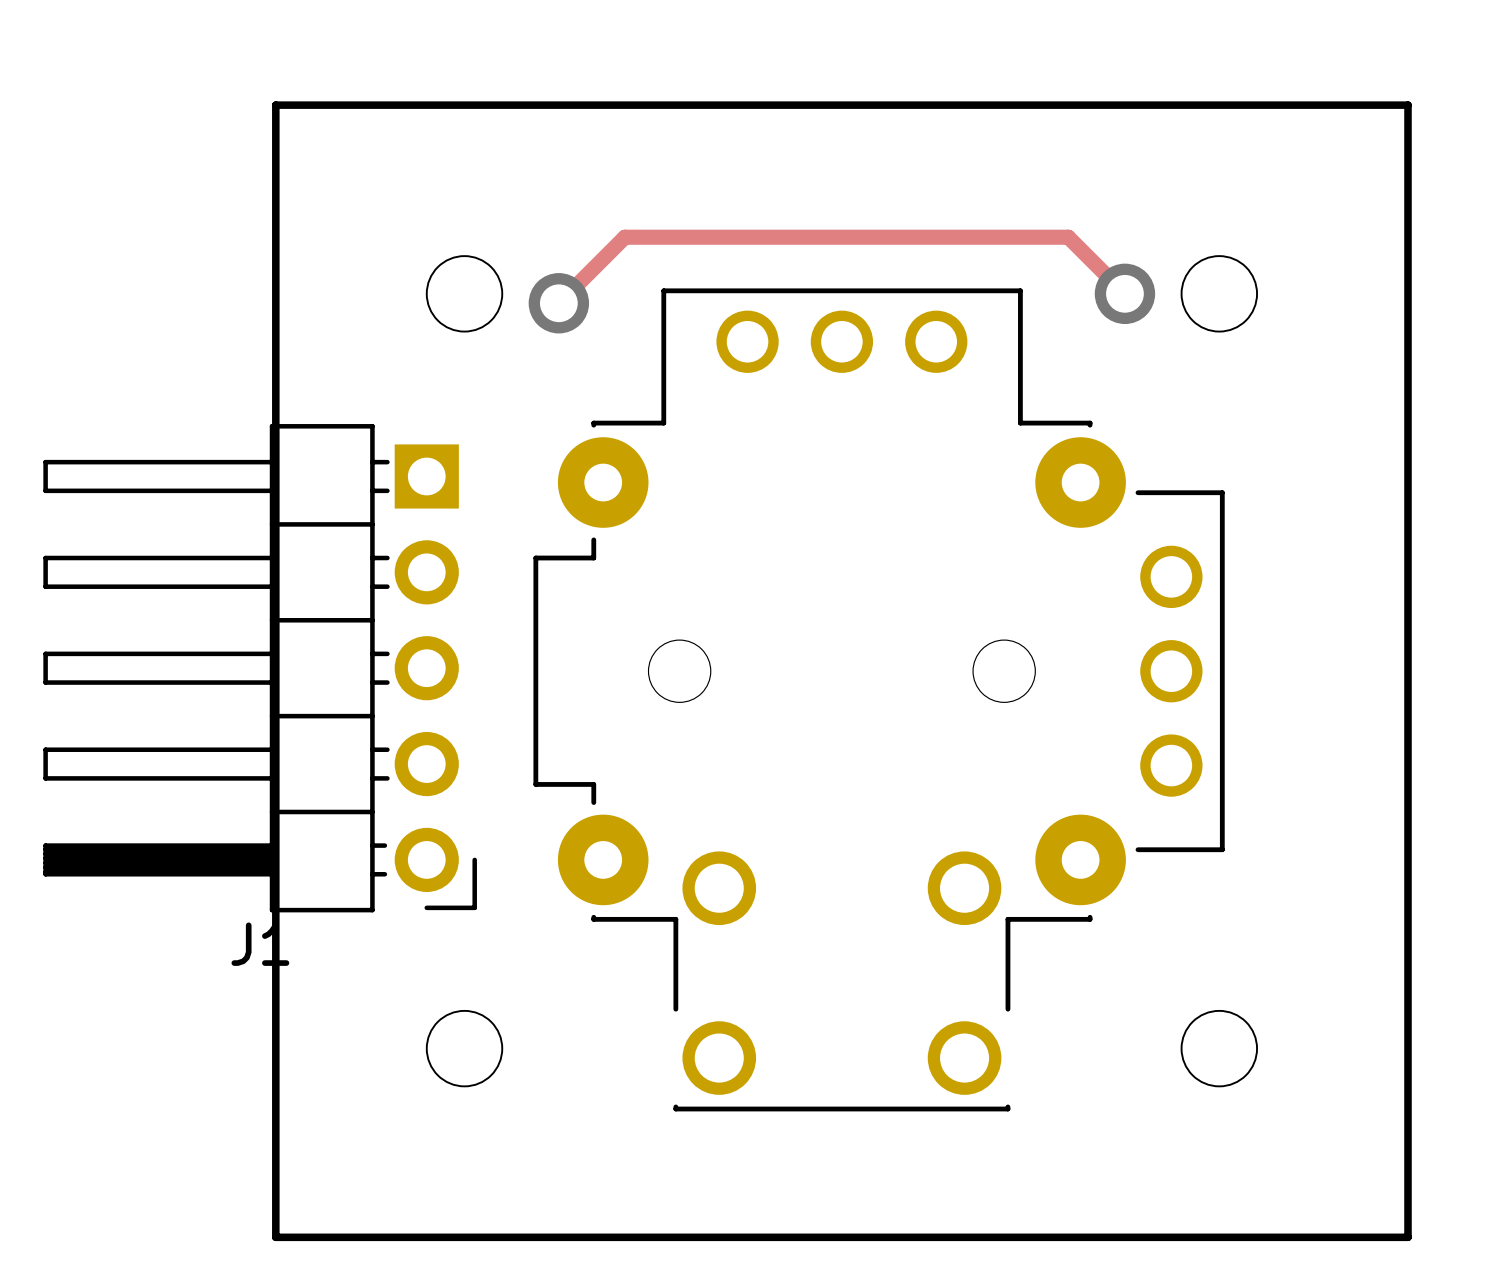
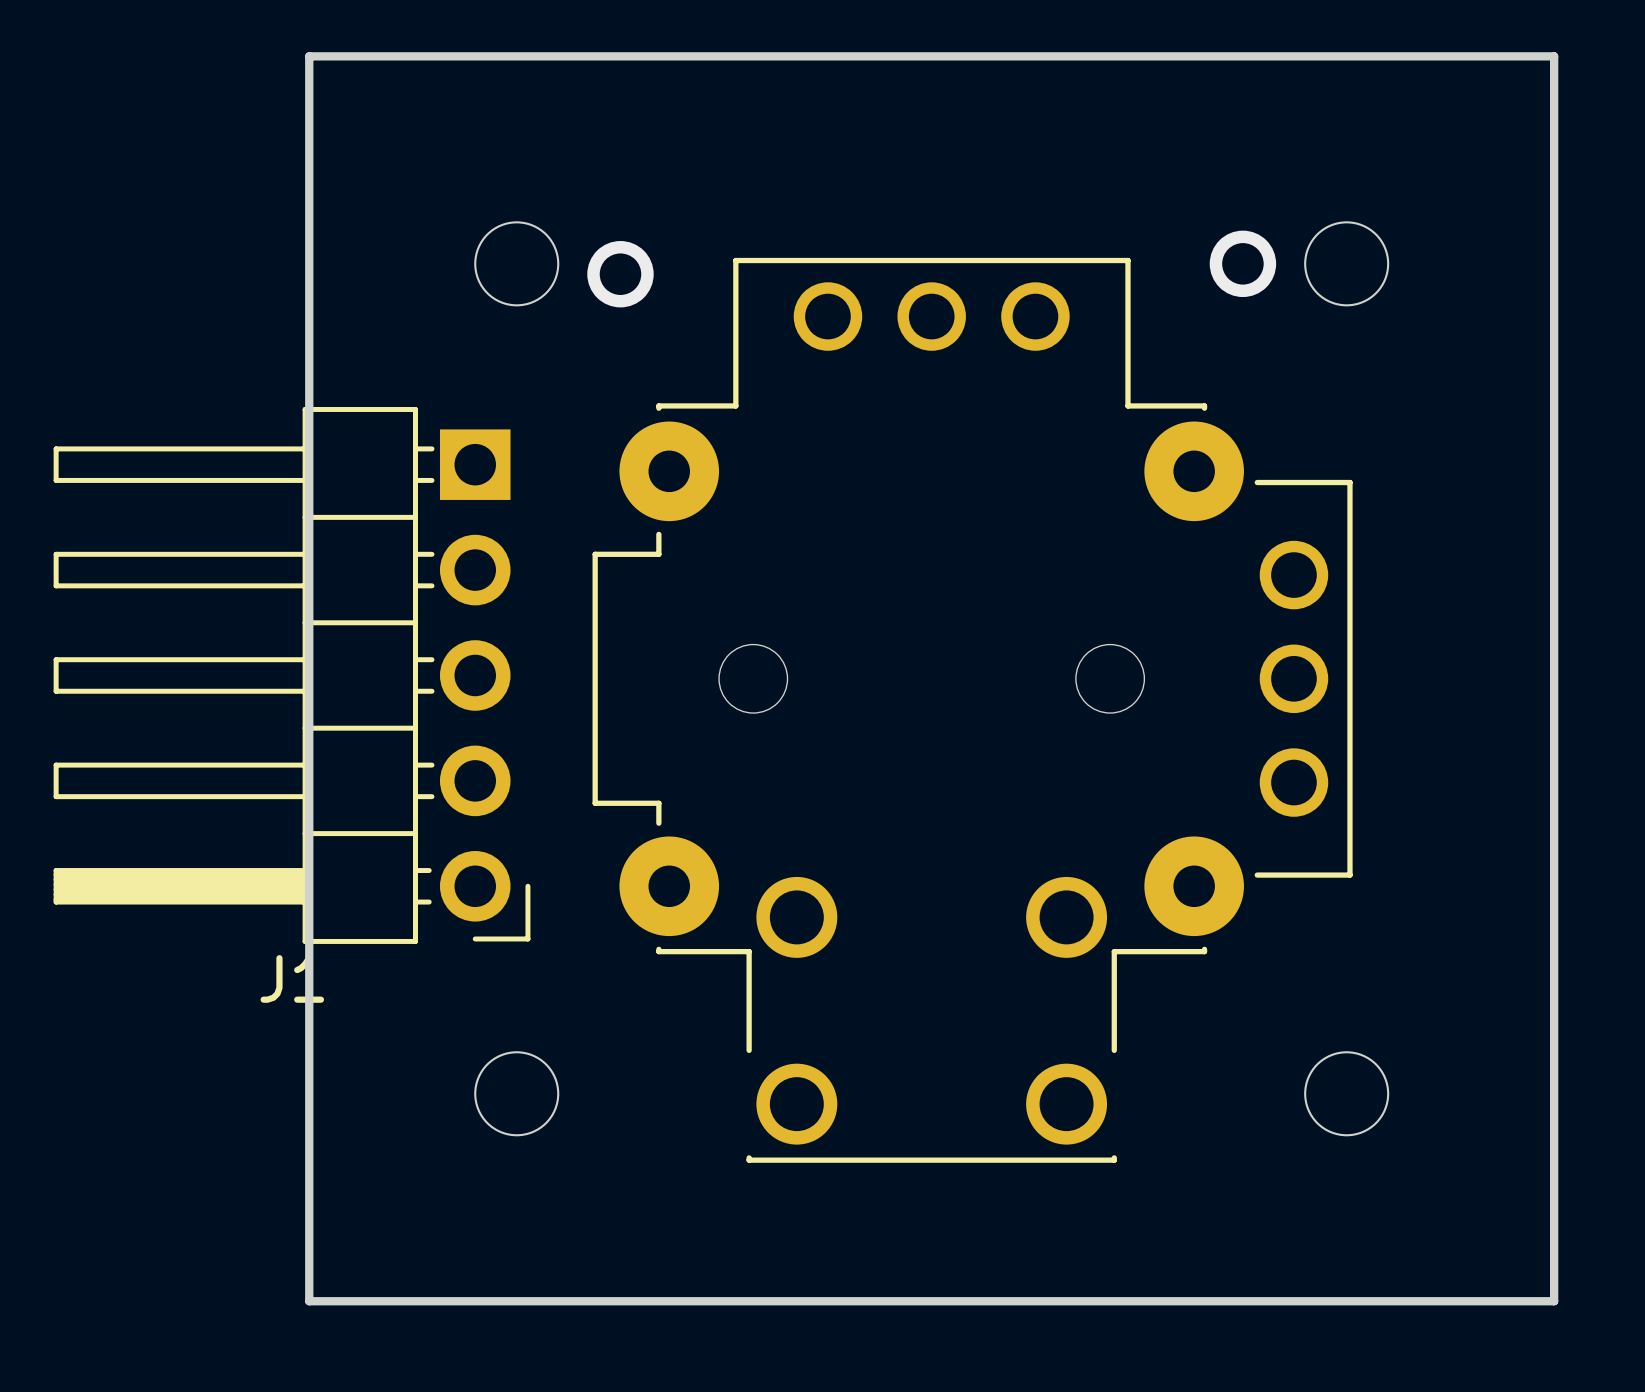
track: (1124, 293) (1068, 237) (624, 237) (558, 303) -> none

